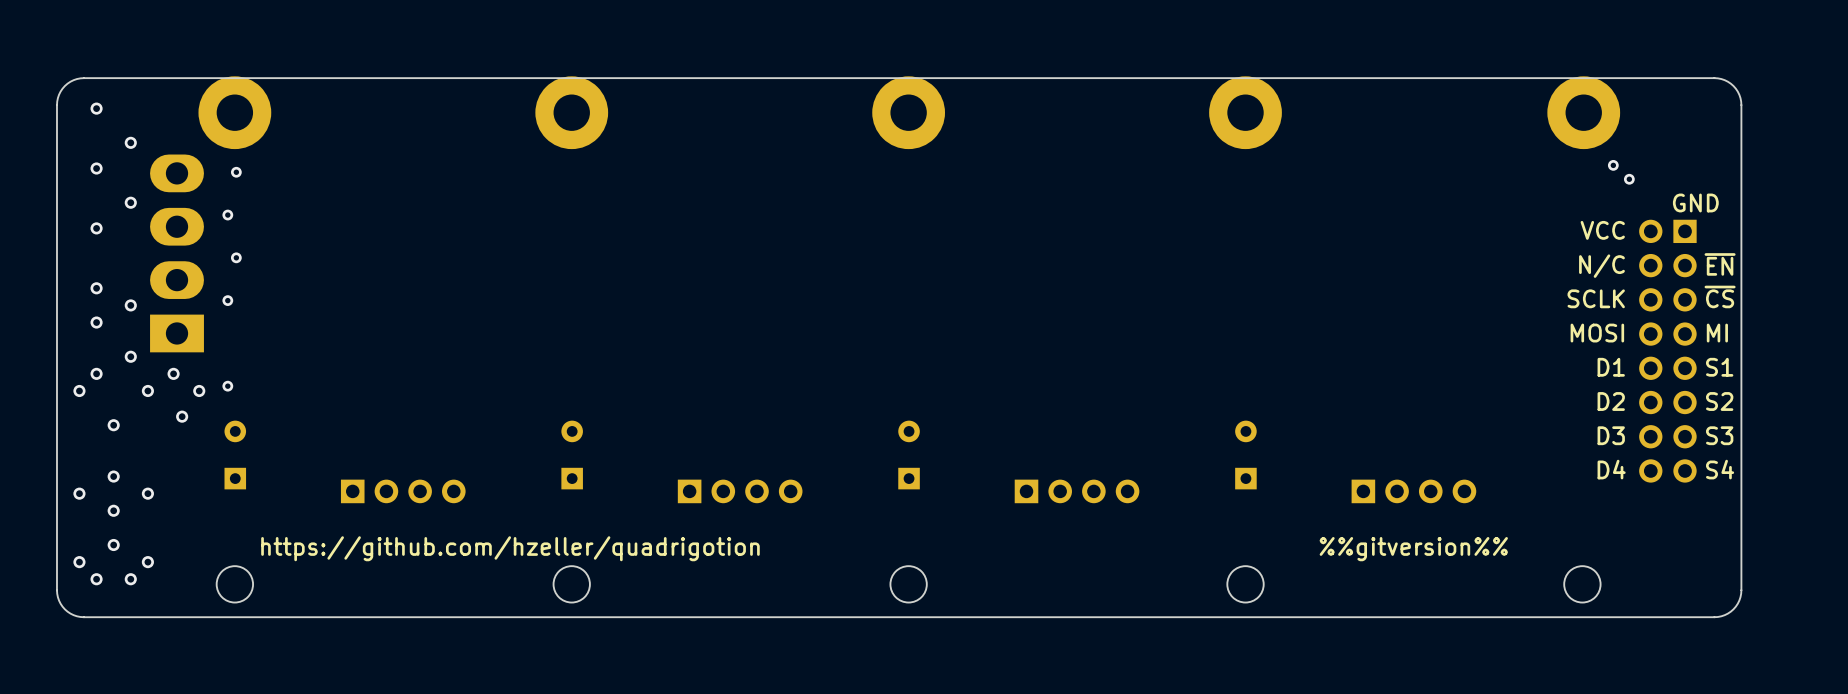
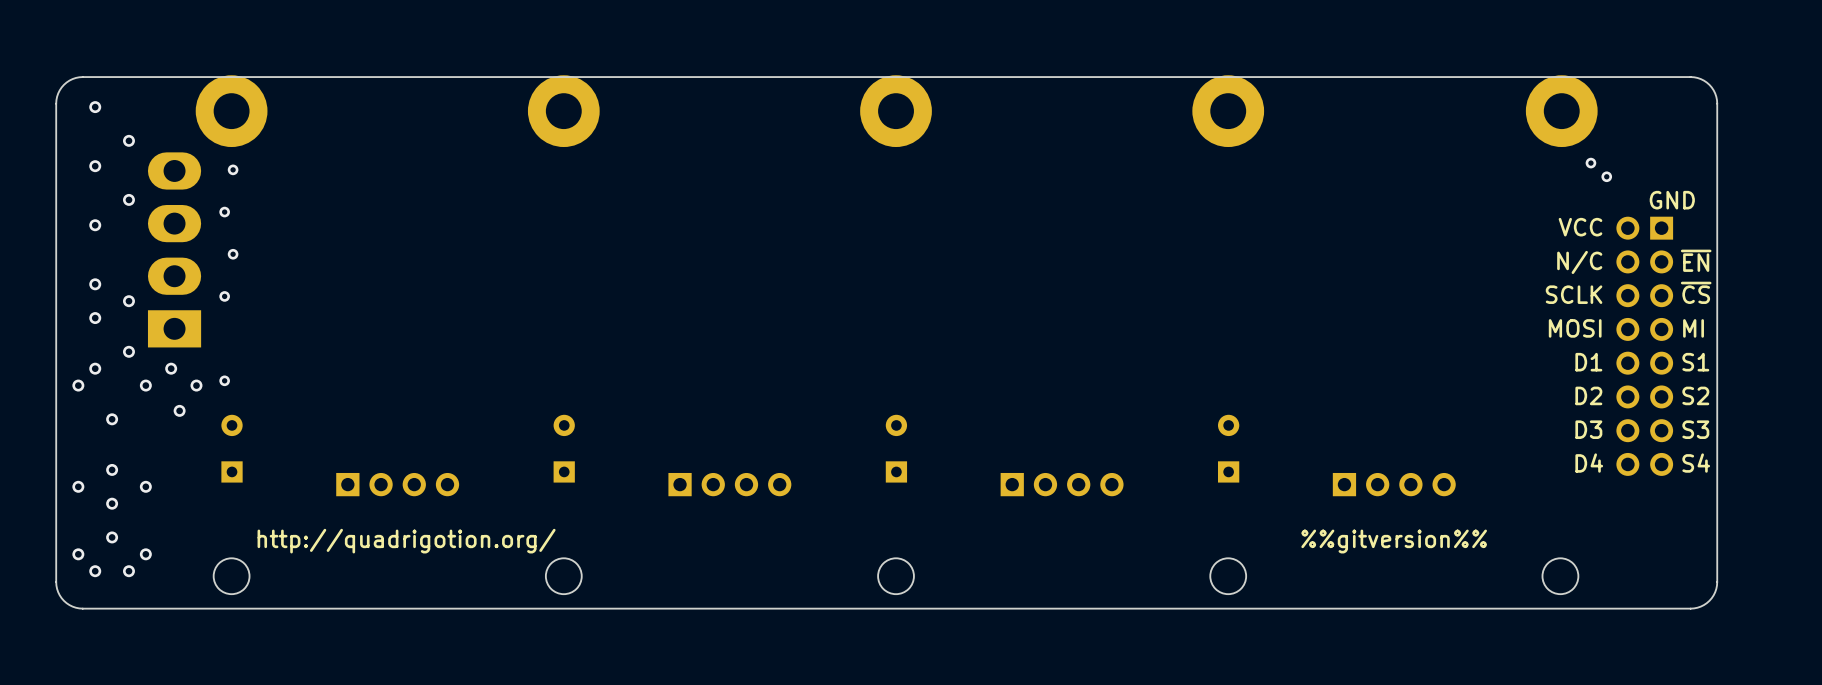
text: https://github.com/hzeller/quadrigotion (510, 548) -> http://quadrigotion.org/ (406, 541)

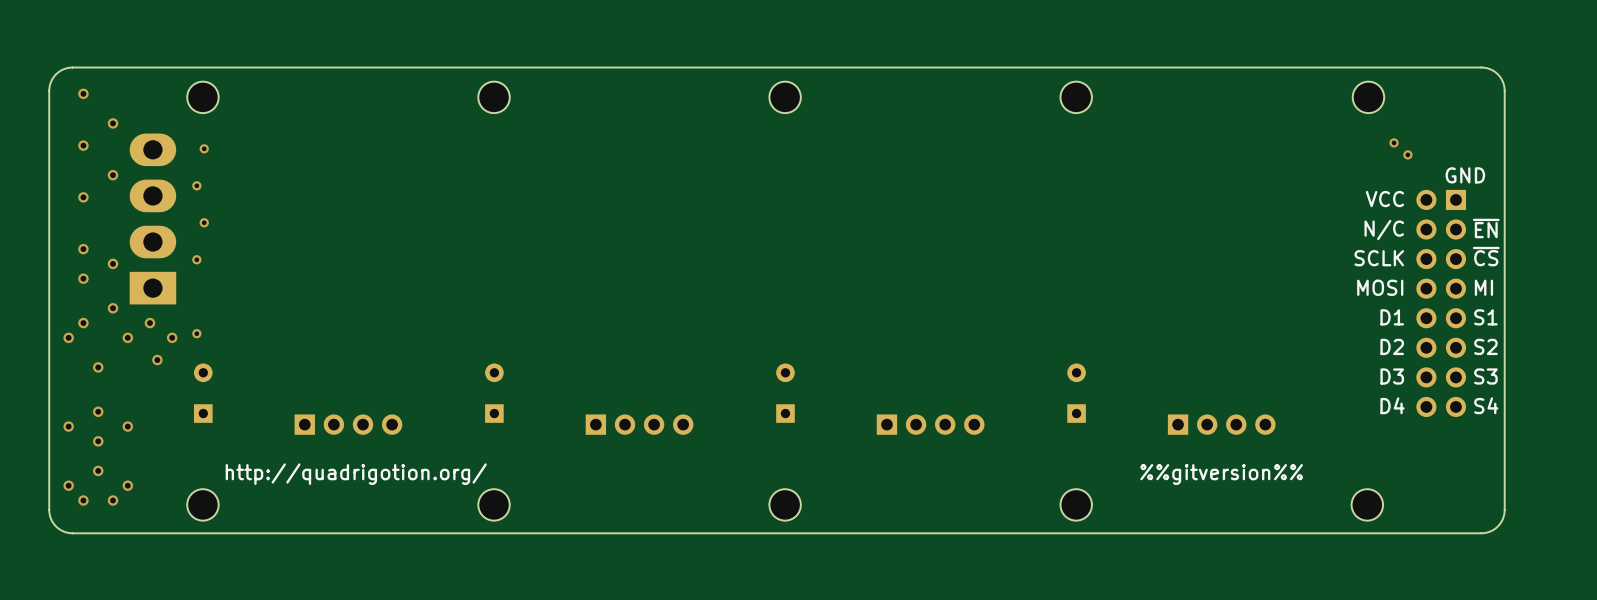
part footprint: [195, 75, 268, 148] -> [187, 81, 219, 114]
part footprint: [527, 75, 600, 148] -> [478, 81, 510, 114]
part footprint: [860, 75, 932, 148] -> [769, 81, 801, 114]
part footprint: [1192, 75, 1265, 148] -> [1060, 81, 1092, 114]
part footprint: [1525, 75, 1598, 148] -> [1352, 81, 1385, 114]

